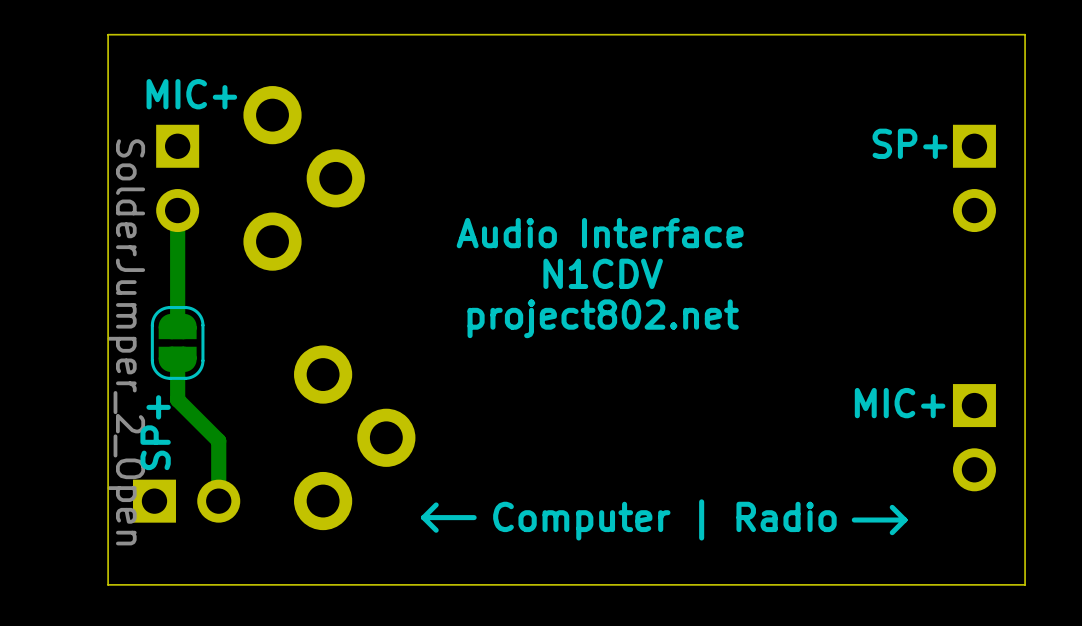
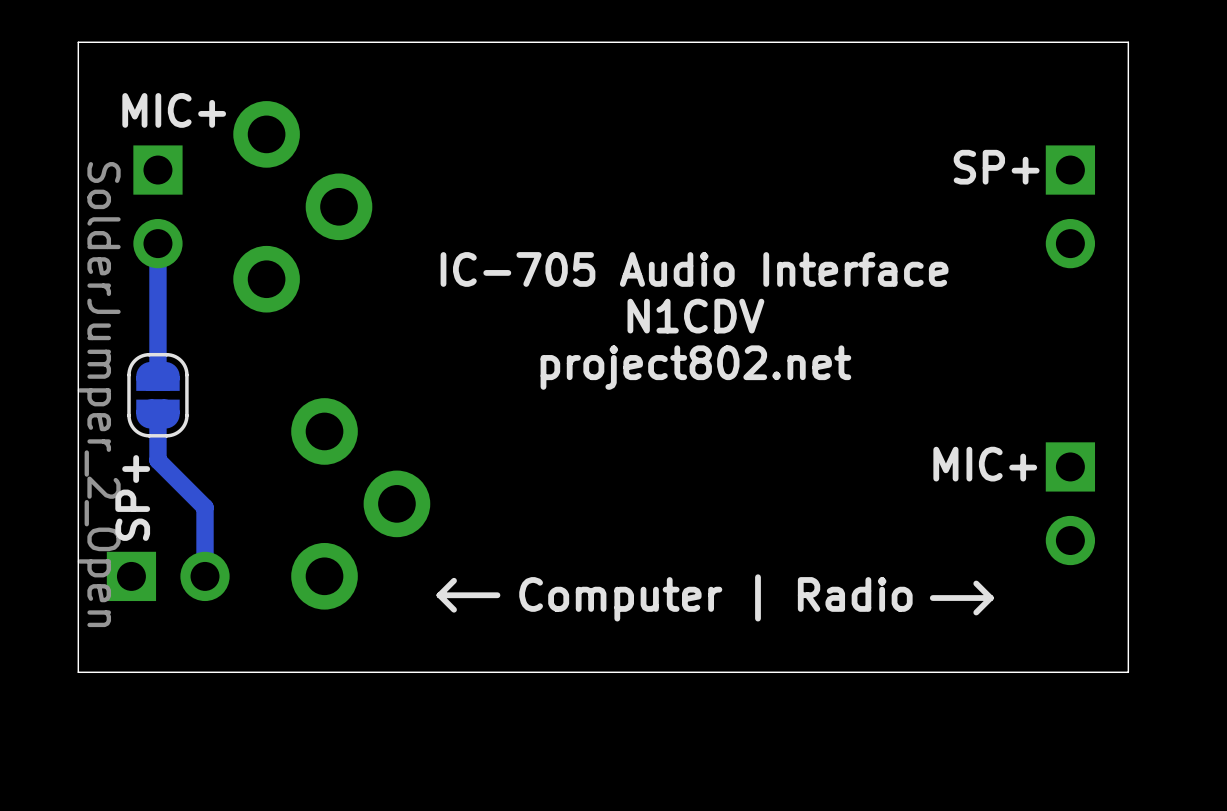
text: Audio Interface (600, 233) -> IC-705 Audio Interface (694, 269)
text position: N1CDV (603, 273) -> N1CDV (695, 316)
text position: project802.net (603, 318) -> project802.net (695, 367)

